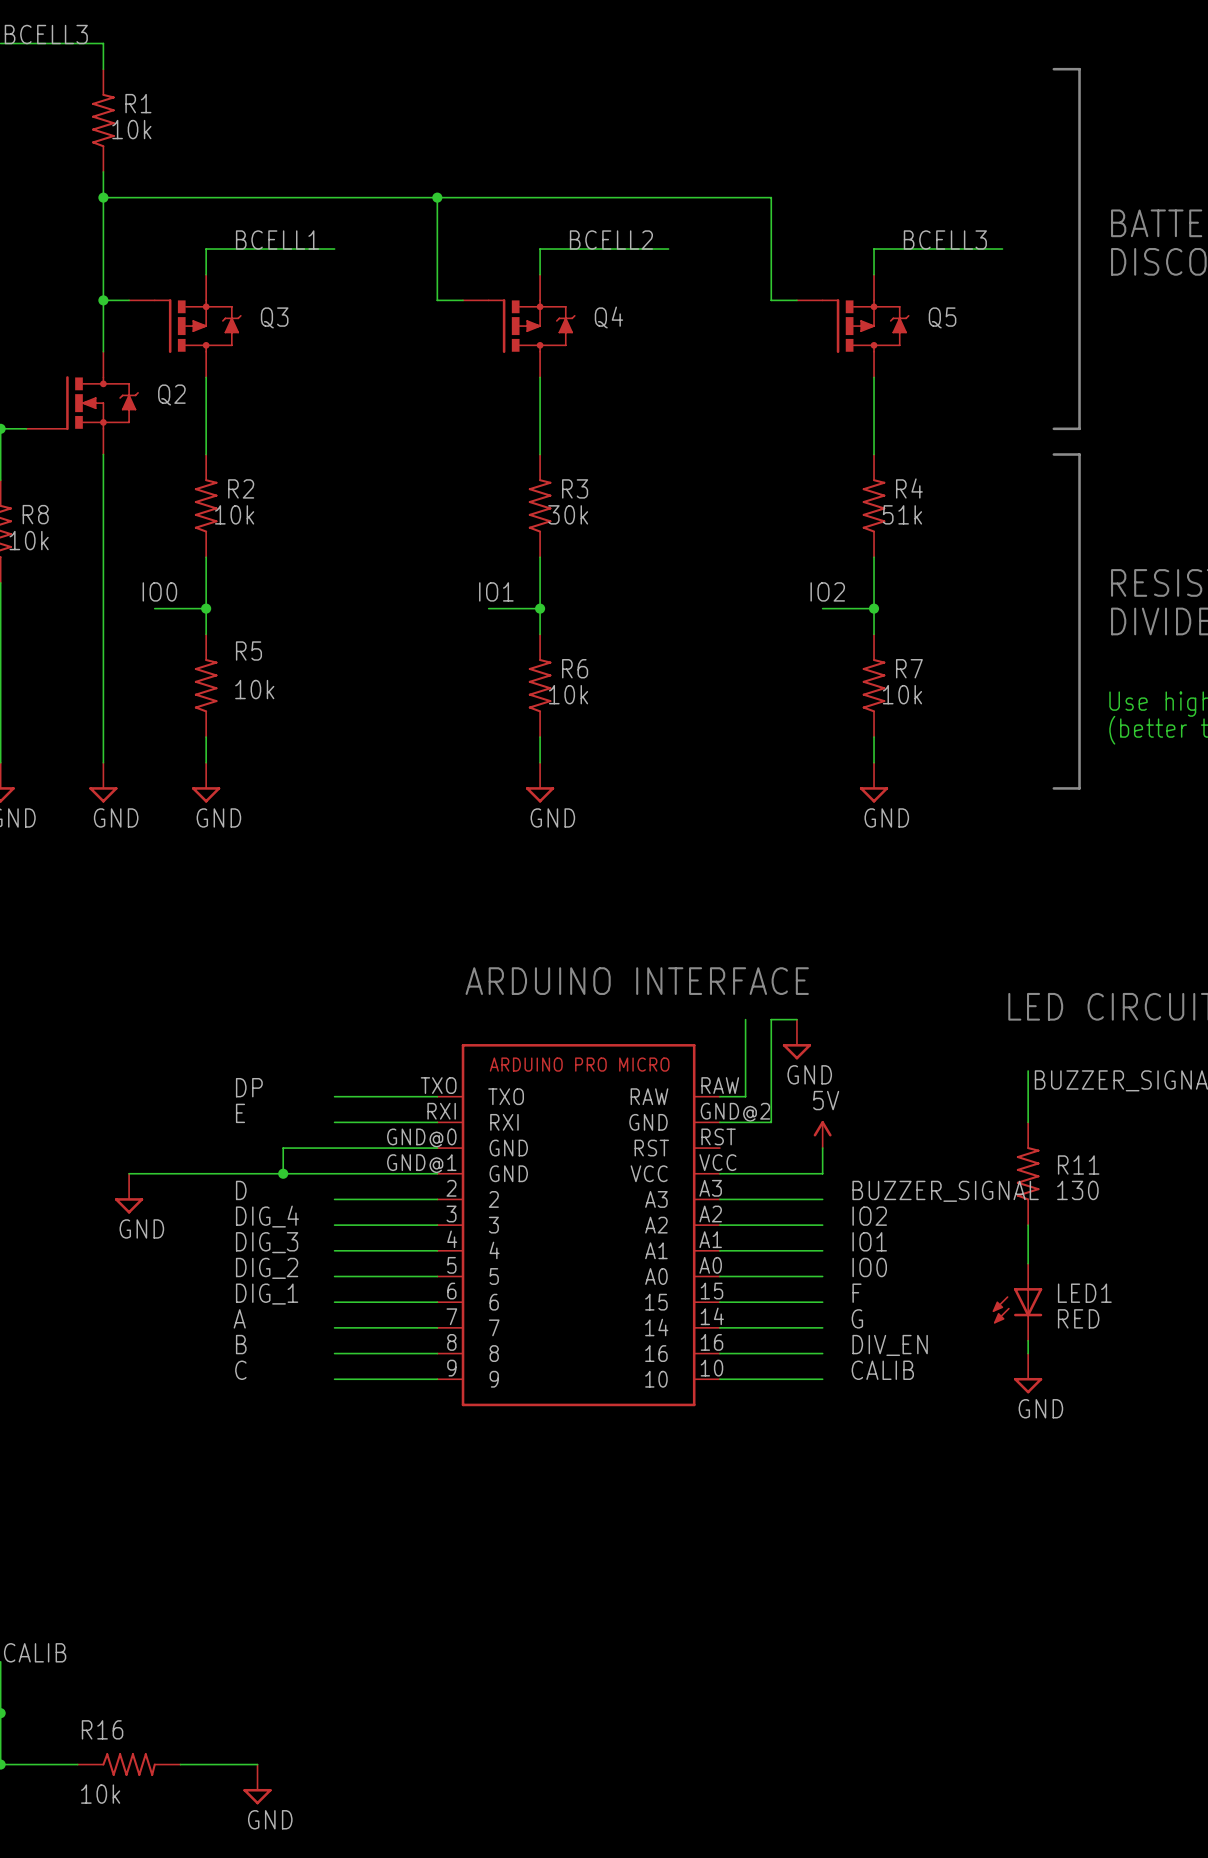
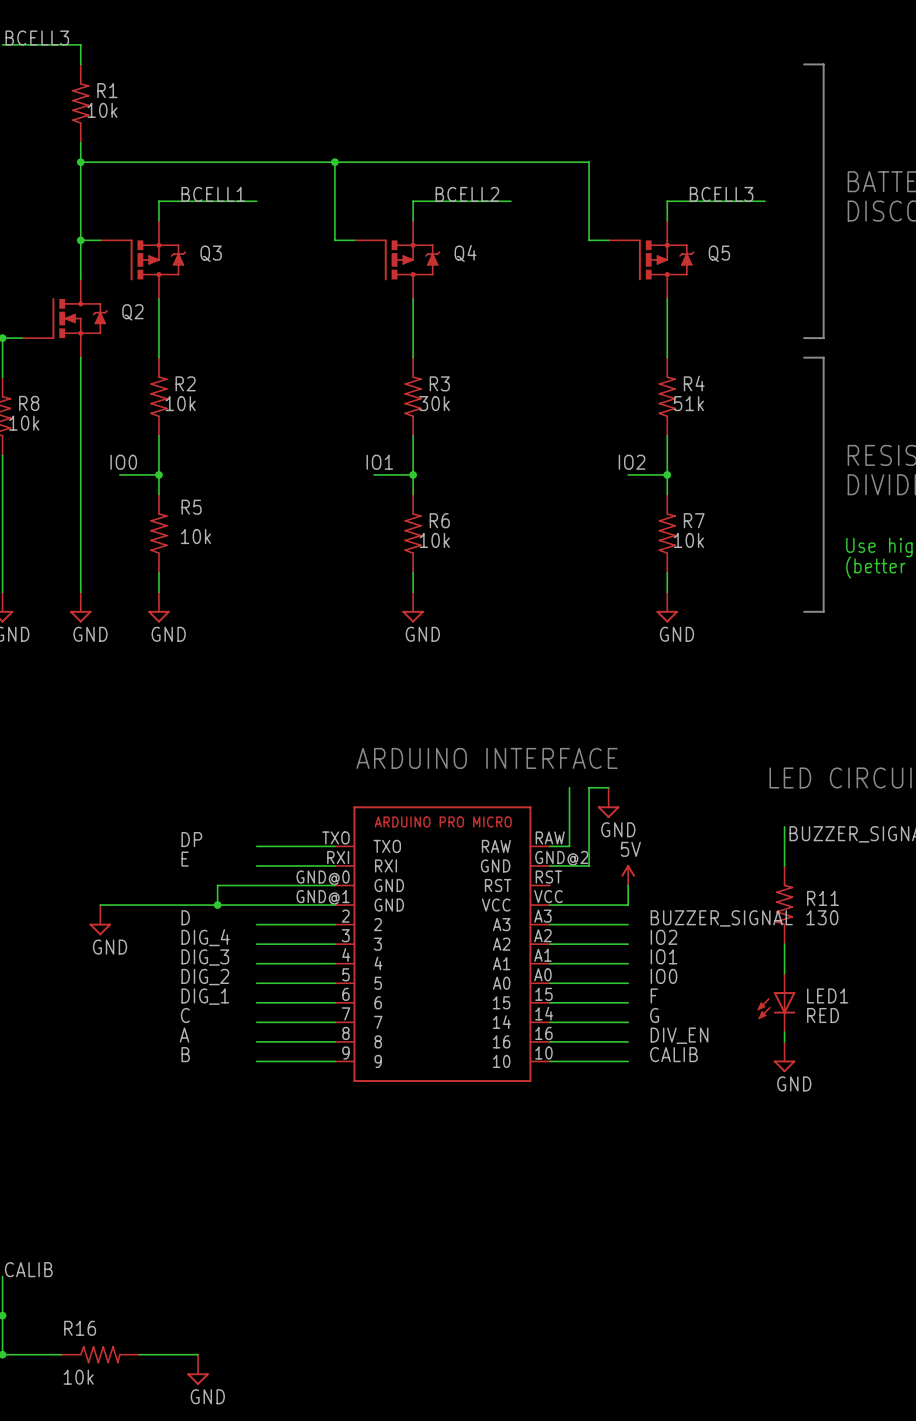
label: A (239, 1318) -> C (185, 1015)
label: B (241, 1344) -> A (184, 1035)
label: C (240, 1370) -> B (185, 1054)

